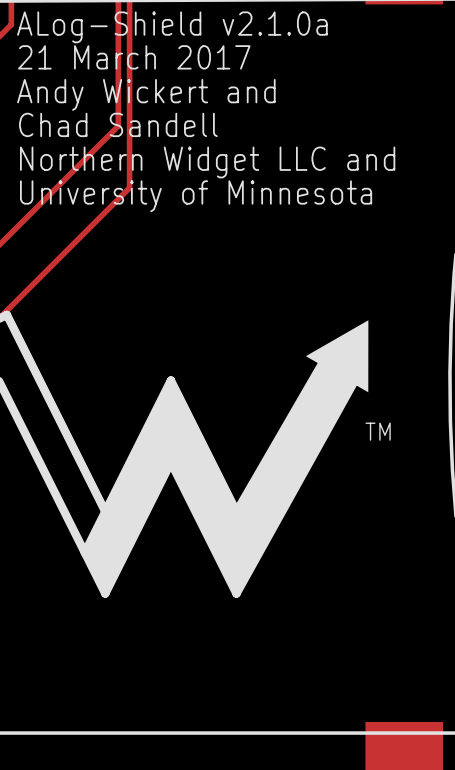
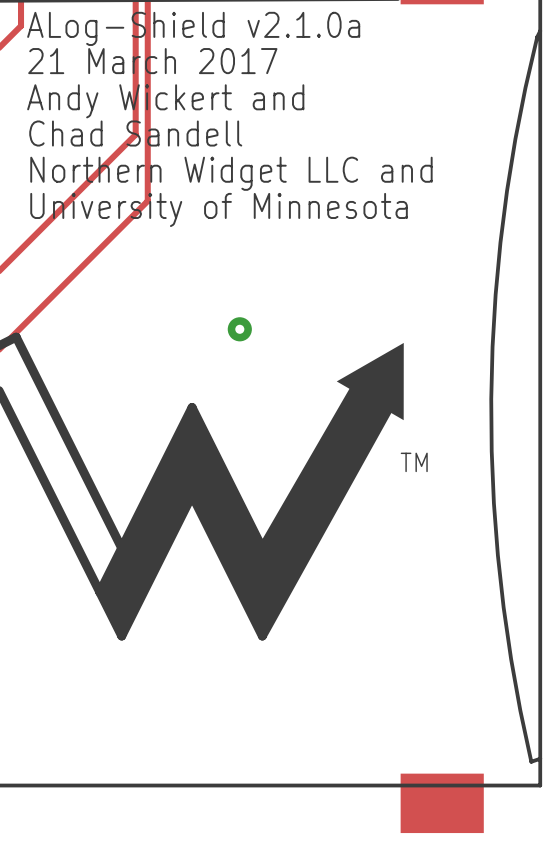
via: none -> (239, 329)

